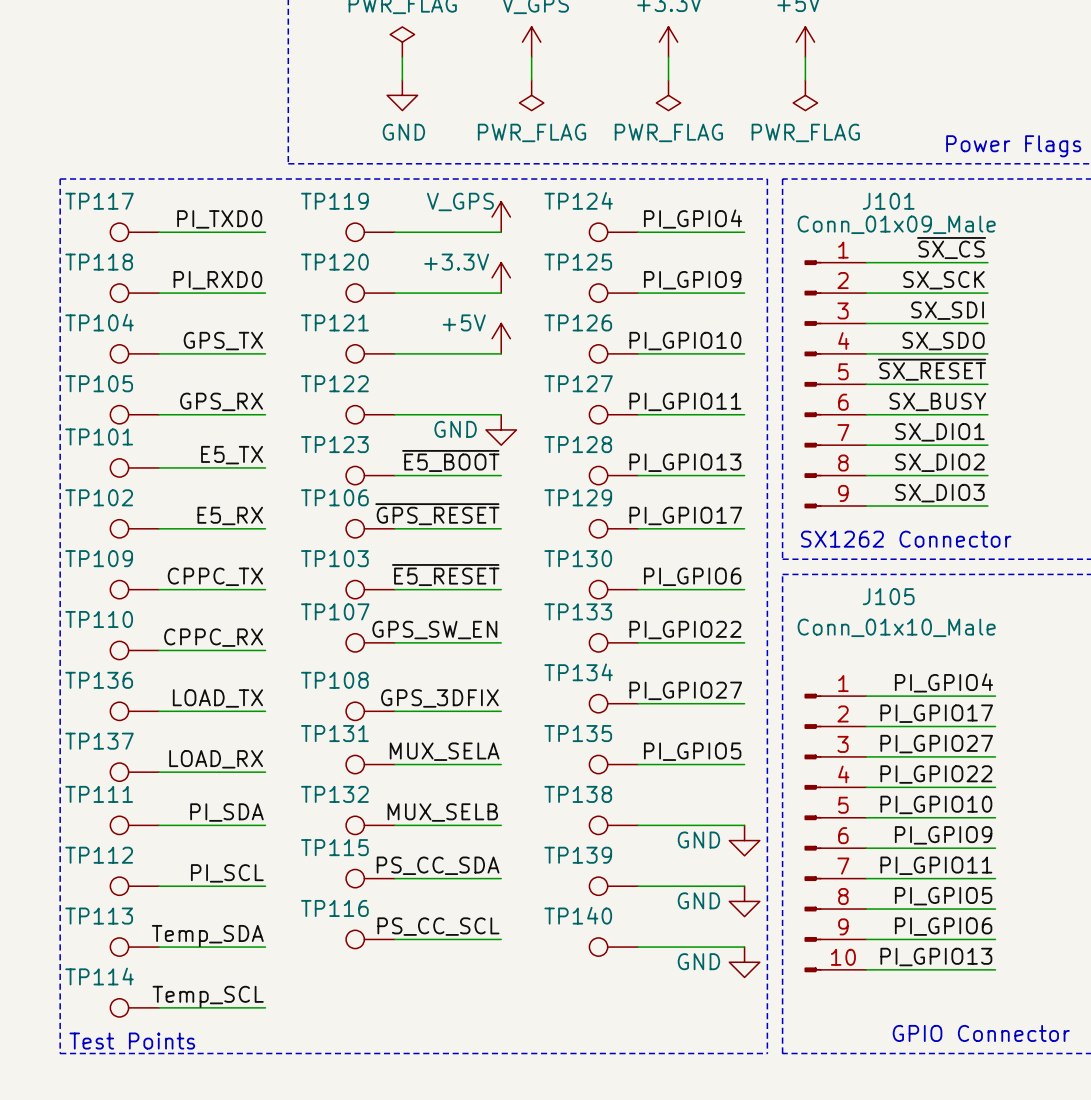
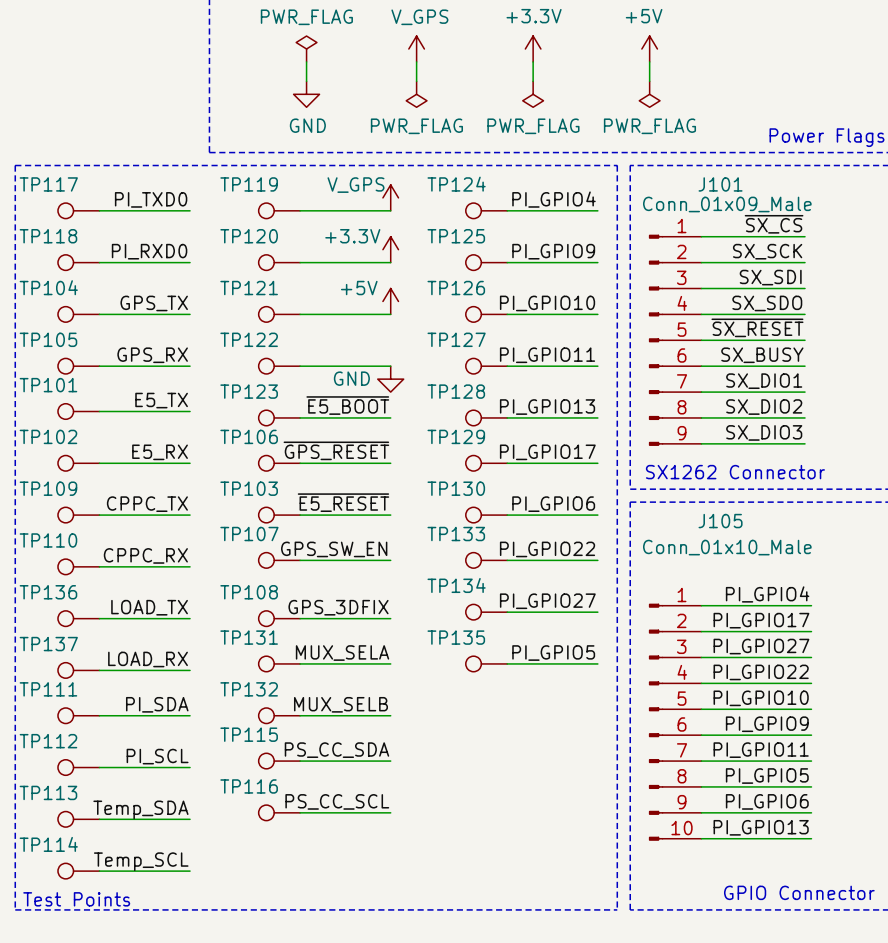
TP138: (613, 825) -> none
wire: (638, 825) (744, 825) -> none
power symbol: GND (744, 840) -> none
TP139: (613, 886) -> none
wire: (638, 886) (744, 886) -> none
power symbol: GND (744, 901) -> none
TP140: (613, 947) -> none
wire: (638, 947) (744, 947) -> none
power symbol: GND (744, 962) -> none

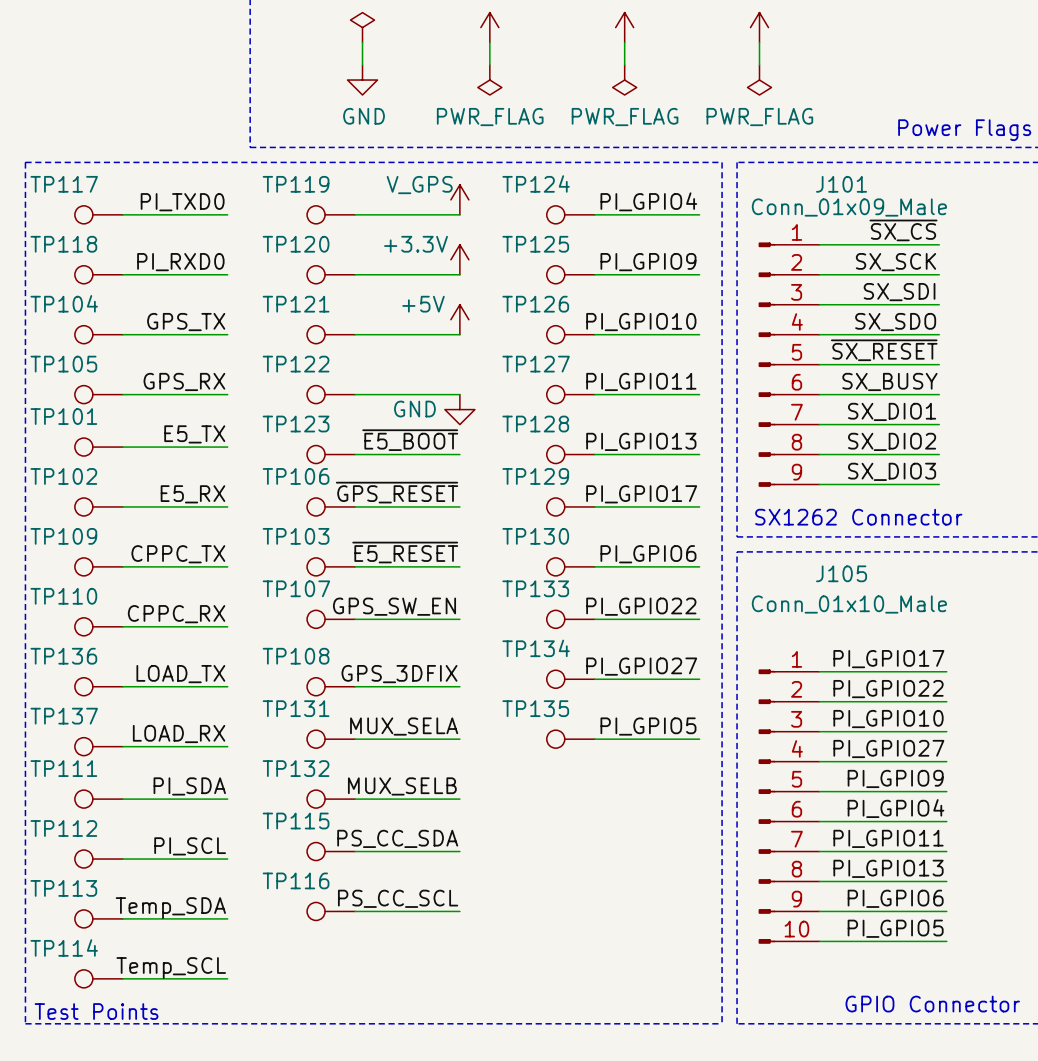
label: PI_GPIO4 (767, 594) -> PI_GPIO17 (888, 659)
label: PI_GPIO17 (761, 620) -> PI_GPIO22 (888, 689)
label: PI_GPIO27 (761, 646) -> PI_GPIO10 (888, 719)
label: PI_GPIO22 (761, 672) -> PI_GPIO27 (888, 748)
label: PI_GPIO10 (761, 698) -> PI_GPIO9 (895, 778)
label: PI_GPIO9 (767, 724) -> PI_GPIO4 (896, 808)
label: PI_GPIO5 (767, 776) -> PI_GPIO13 (888, 868)
label: PI_GPIO13 (761, 827) -> PI_GPIO5 (895, 928)

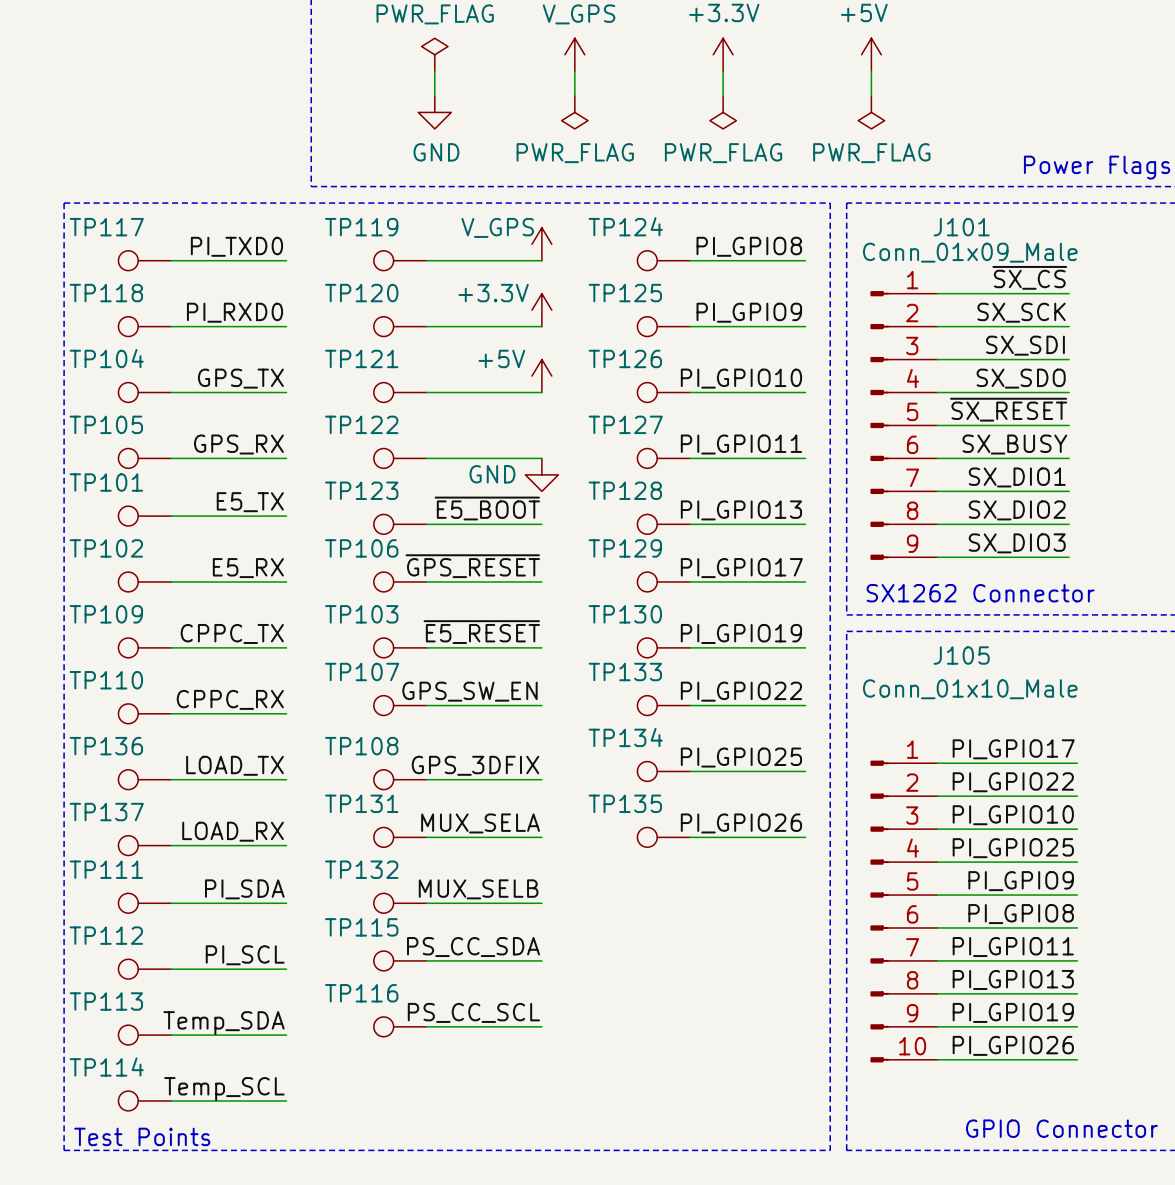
label: PI_GPIO4 (648, 201) -> PI_GPIO8 (749, 246)
label: PI_GPIO6 (648, 554) -> PI_GPIO19 (741, 633)
label: PI_GPIO27 (641, 666) -> PI_GPIO25 (741, 757)
label: PI_GPIO5 (648, 726) -> PI_GPIO26 (741, 823)
label: PI_GPIO27 (888, 748) -> PI_GPIO25 (1013, 848)
label: PI_GPIO4 (896, 808) -> PI_GPIO8 (1021, 914)
label: PI_GPIO6 (895, 898) -> PI_GPIO19 (1013, 1012)
label: PI_GPIO5 (895, 928) -> PI_GPIO26 (1013, 1045)

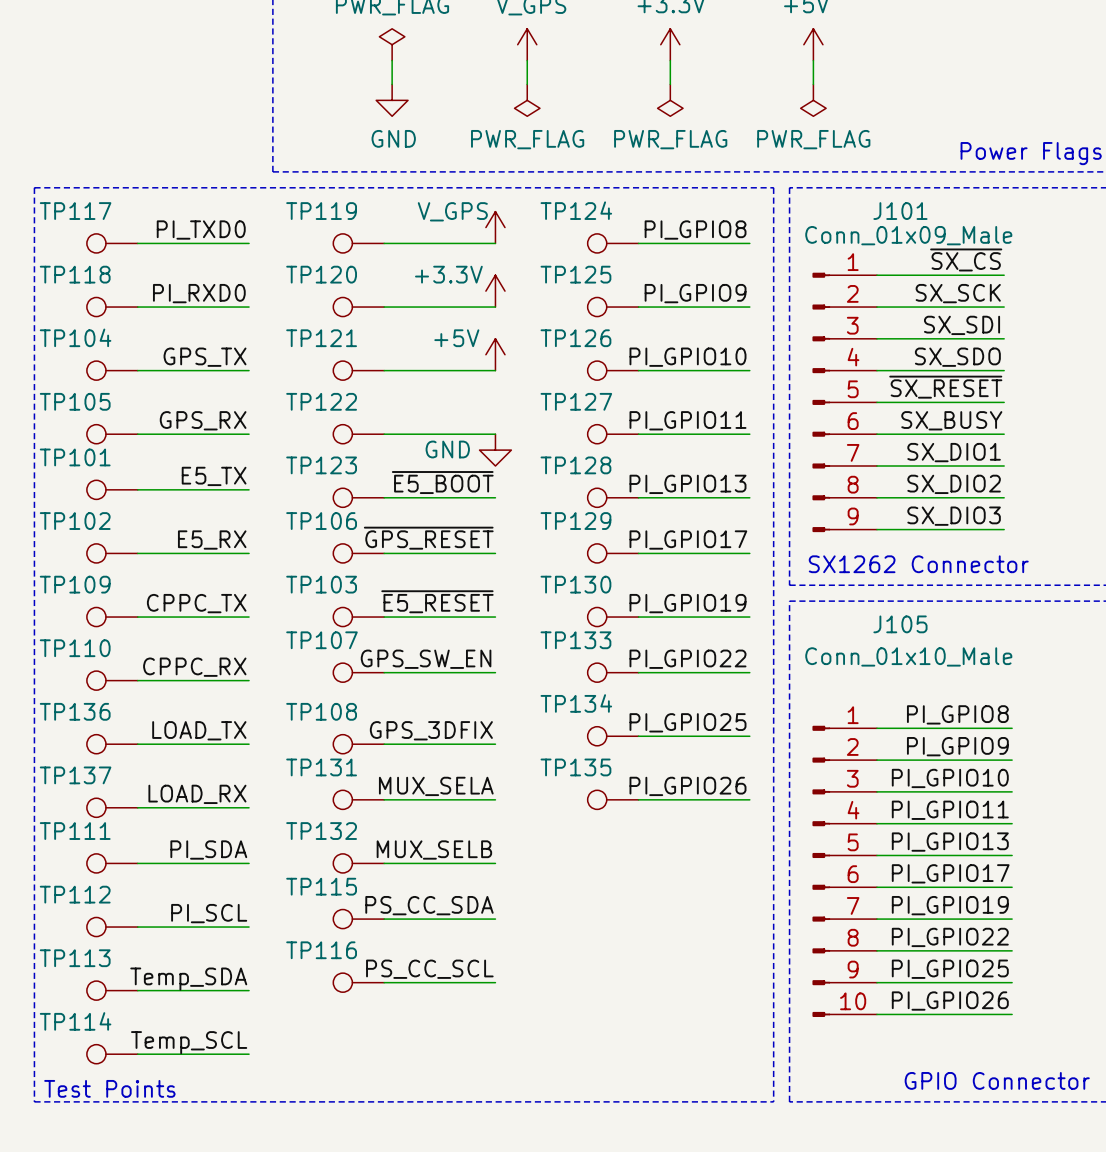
label: PI_GPIO17 (1013, 749) -> PI_GPIO8 (957, 714)
label: PI_GPIO22 (1013, 782) -> PI_GPIO9 (957, 746)
label: PI_GPIO25 (1013, 848) -> PI_GPIO11 (950, 810)
label: PI_GPIO9 (1021, 881) -> PI_GPIO13 (950, 842)
label: PI_GPIO8 (1021, 914) -> PI_GPIO17 (950, 873)
label: PI_GPIO11 (1013, 947) -> PI_GPIO19 (950, 905)
label: PI_GPIO13 (1013, 979) -> PI_GPIO22 (950, 937)
label: PI_GPIO19 (1013, 1012) -> PI_GPIO25 (950, 969)

